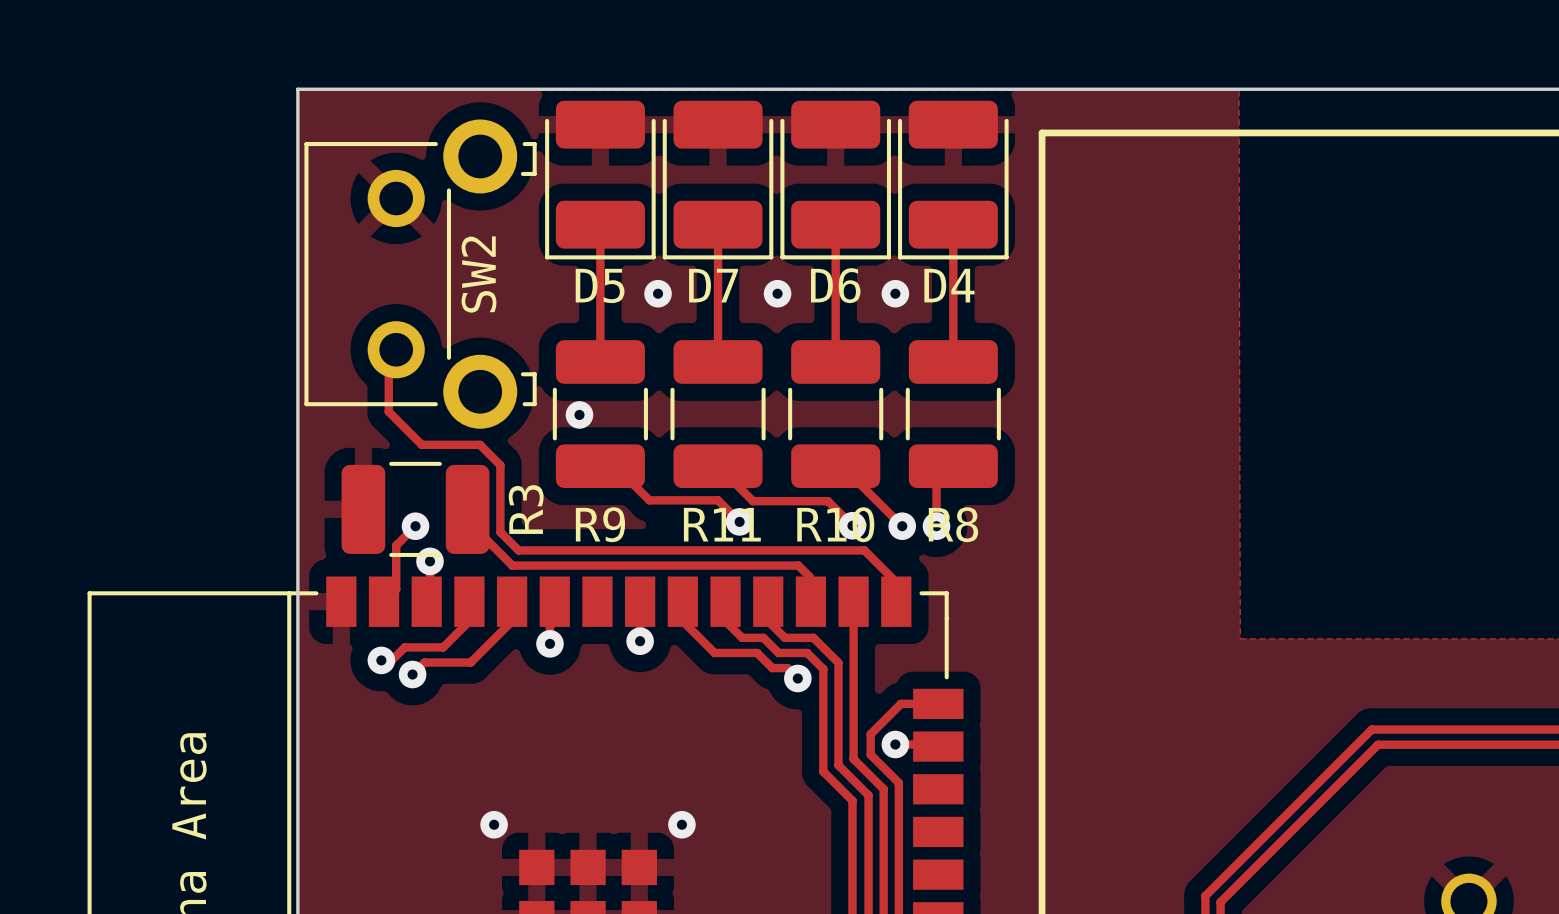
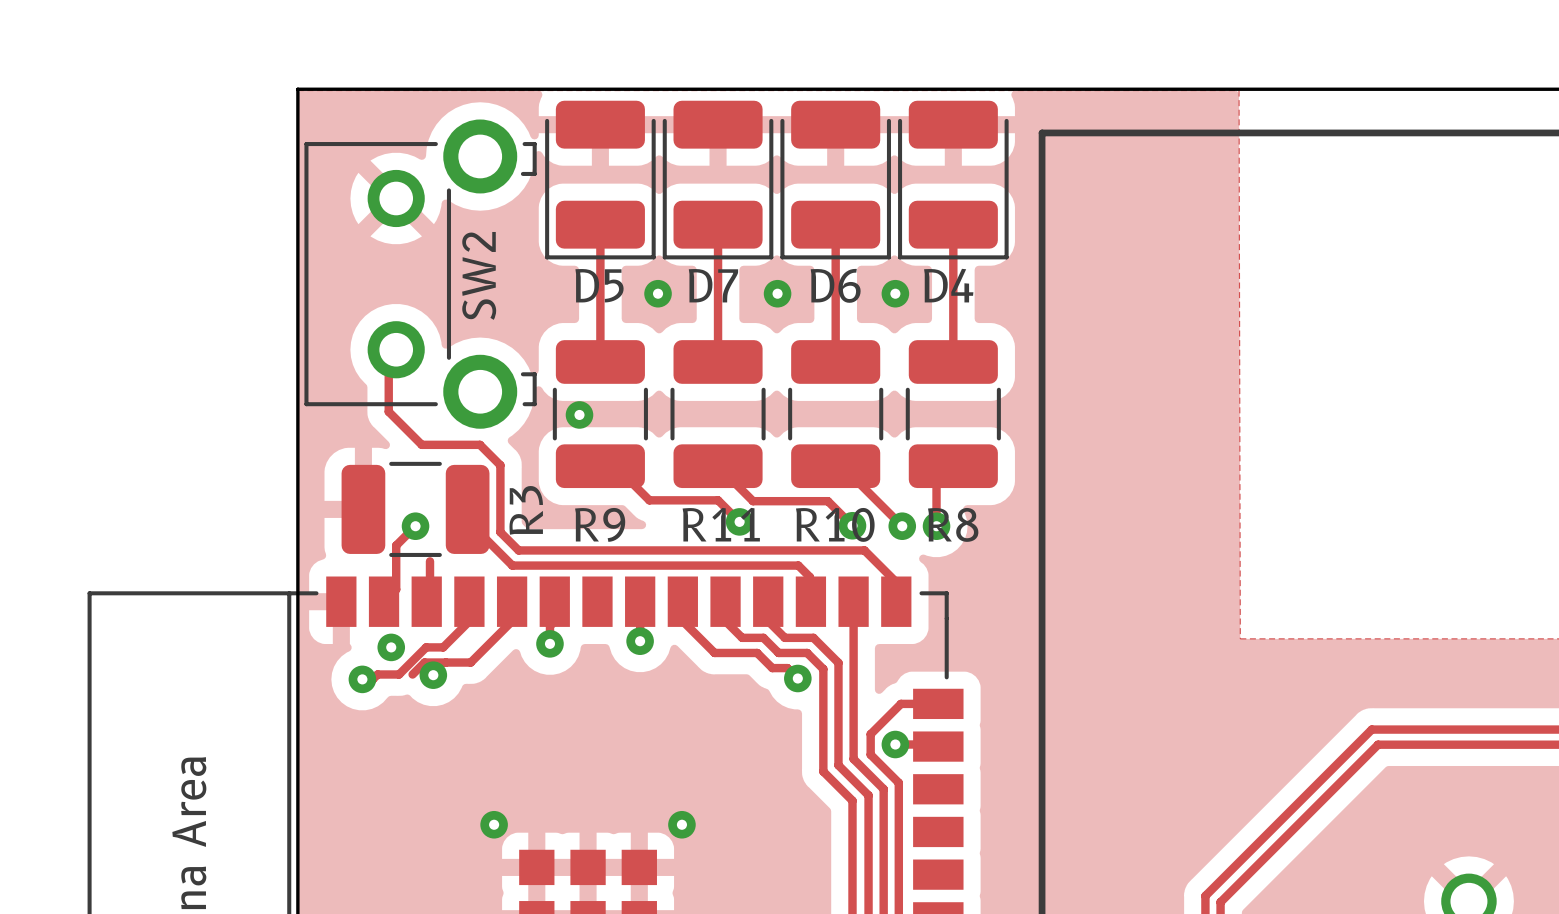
via: (430, 561) -> none
via: none -> (391, 647)
track: (426, 647) (404, 647) (391, 660) (381, 660) -> (426, 647) (399, 674) (377, 674) (372, 679) (362, 679)
via: (381, 660) -> none
via: (412, 674) -> none
via: none -> (433, 675)
via: none -> (362, 679)

